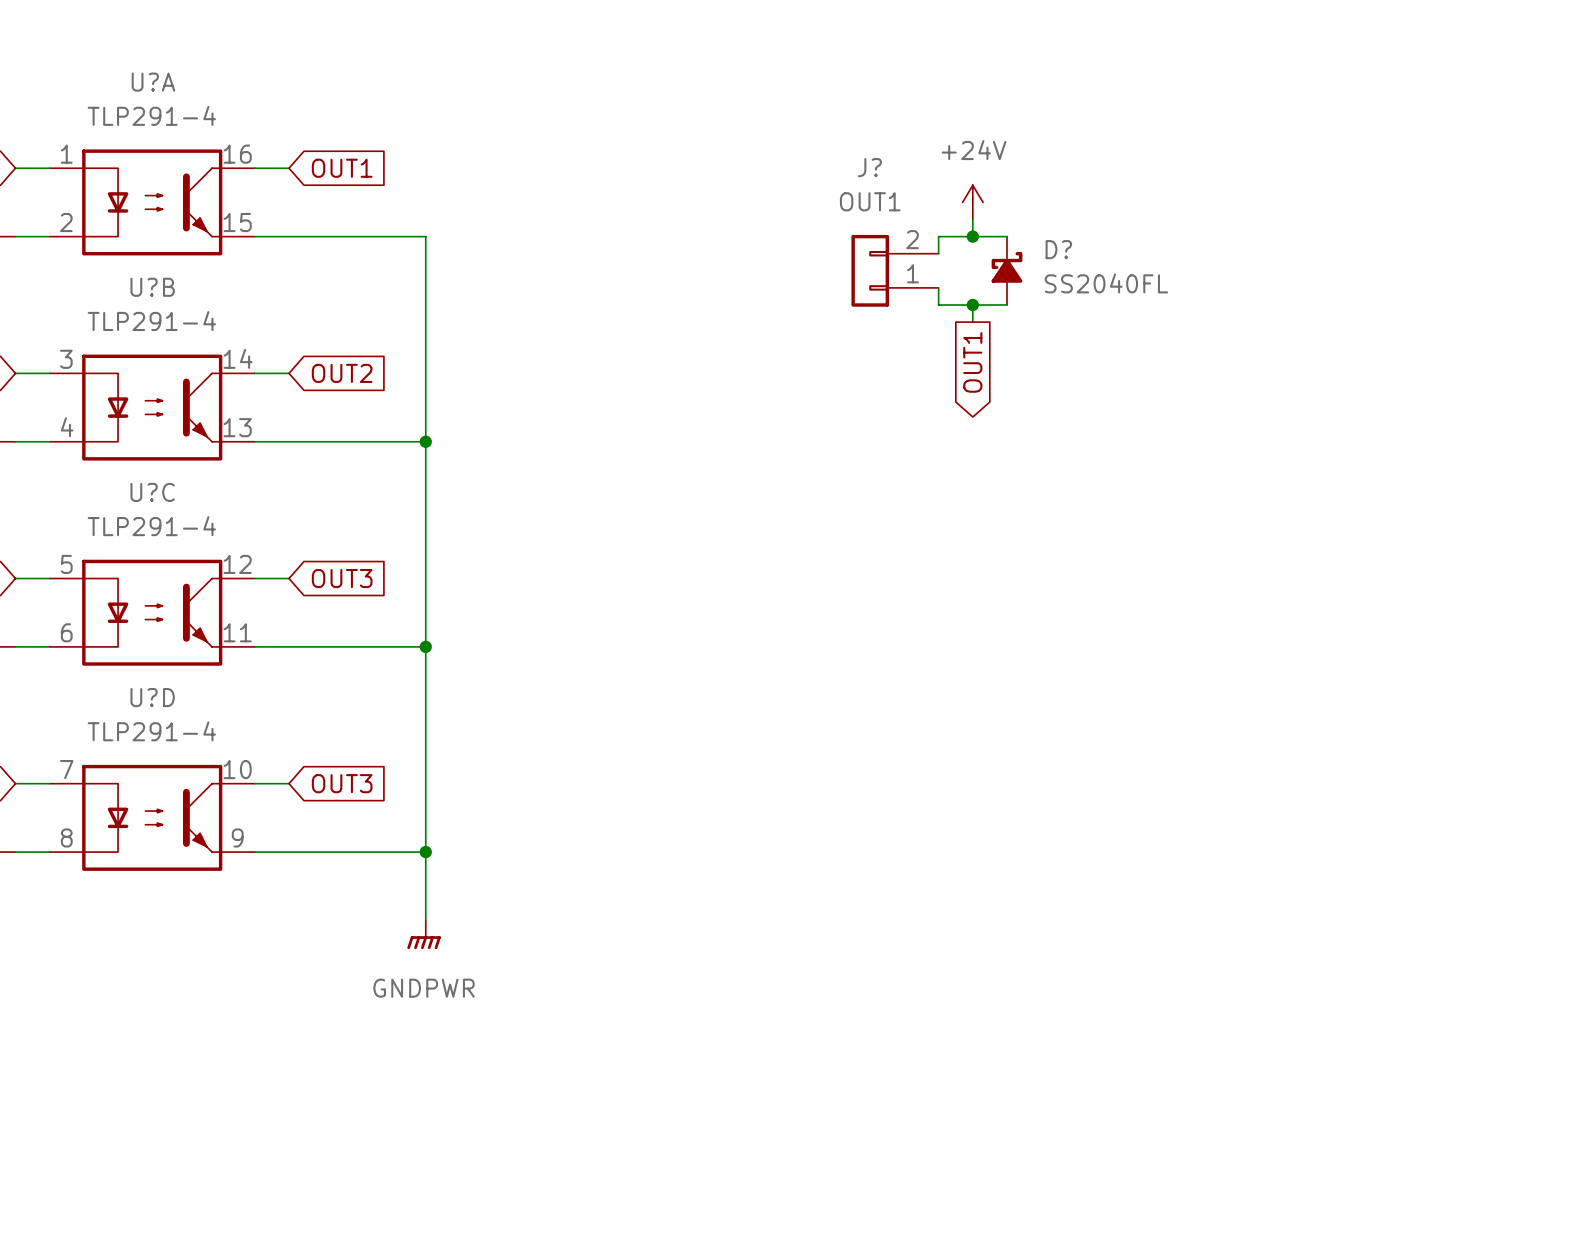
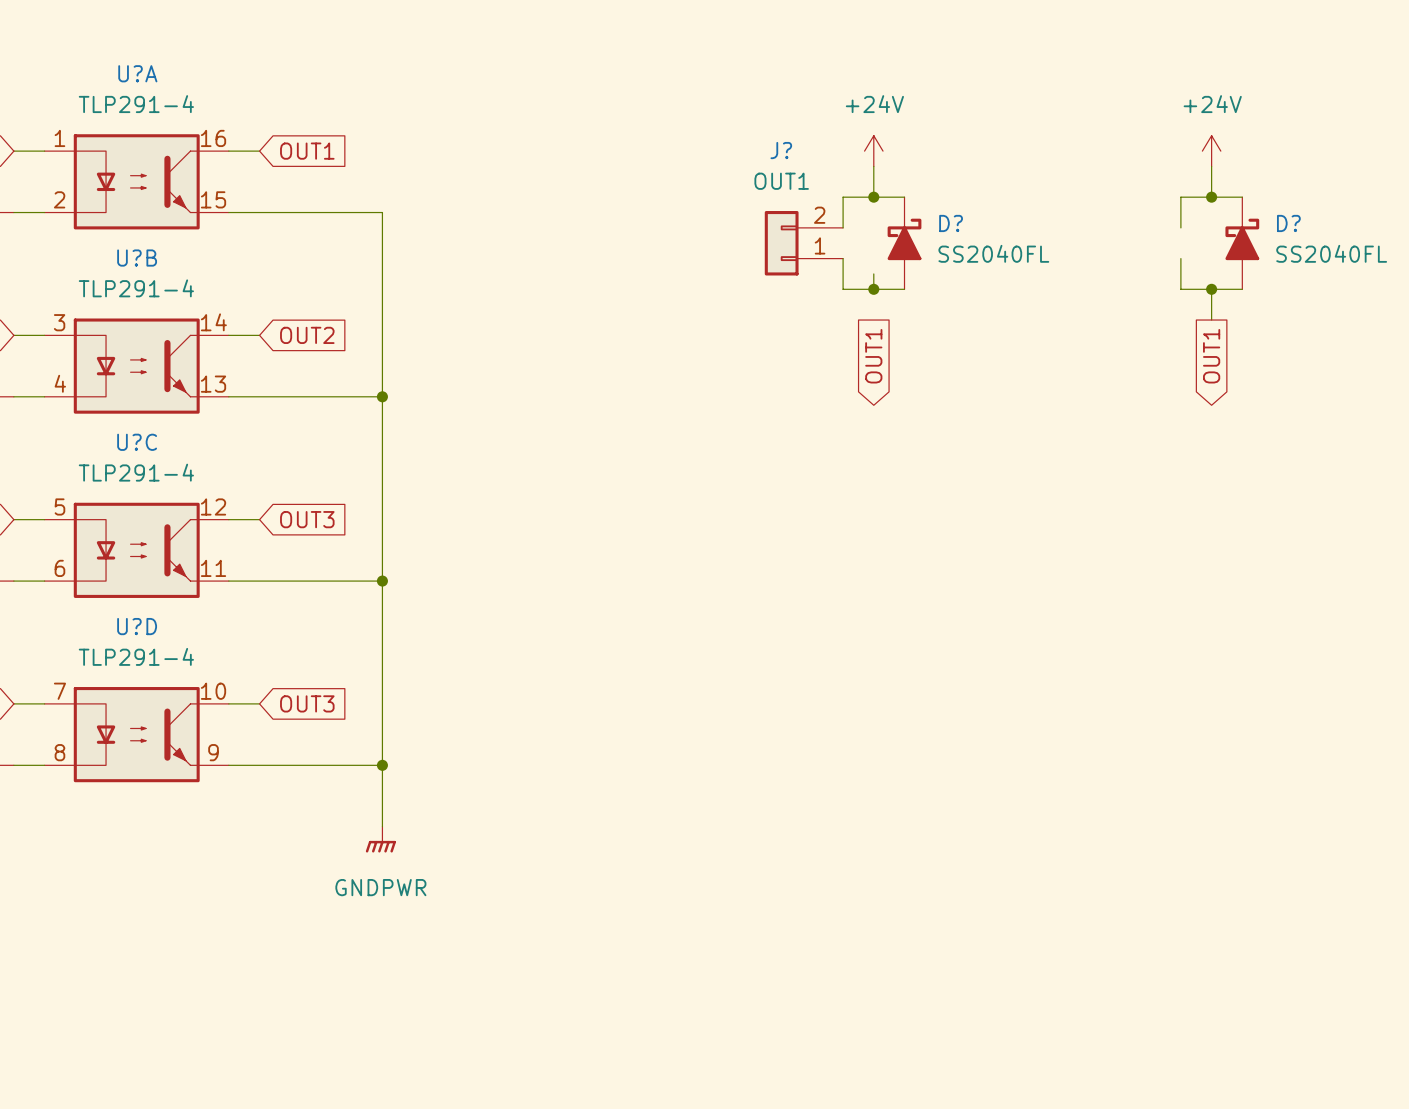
power symbol: none -> +24V (1211, 151)
wire: none -> (1211, 166) (1211, 197)
power symbol position: +24V (972, 202) -> +24V (873, 151)
junction: none -> (1211, 197)
wire: none -> (1242, 197) (1180, 197) (1180, 227)
wire: (938, 236) (1007, 236) -> (843, 212) (843, 197) (904, 197)
junction position: (972, 236) -> (873, 197)
D? symbol: [991, 236, 1023, 306] -> [887, 197, 922, 290]
D?: none -> SS2040FL (1242, 243)
wire: none -> (1180, 258) (1180, 289) (1242, 289)
wire: (938, 305) (1007, 305) -> (843, 273) (843, 289) (904, 289)
junction position: (972, 305) -> (873, 289)
wire: none -> (1211, 289) (1211, 320)
junction: none -> (1211, 289)
global label position: OUT1 (972, 362) -> OUT1 (873, 356)
global label: none -> OUT1 (1211, 356)

